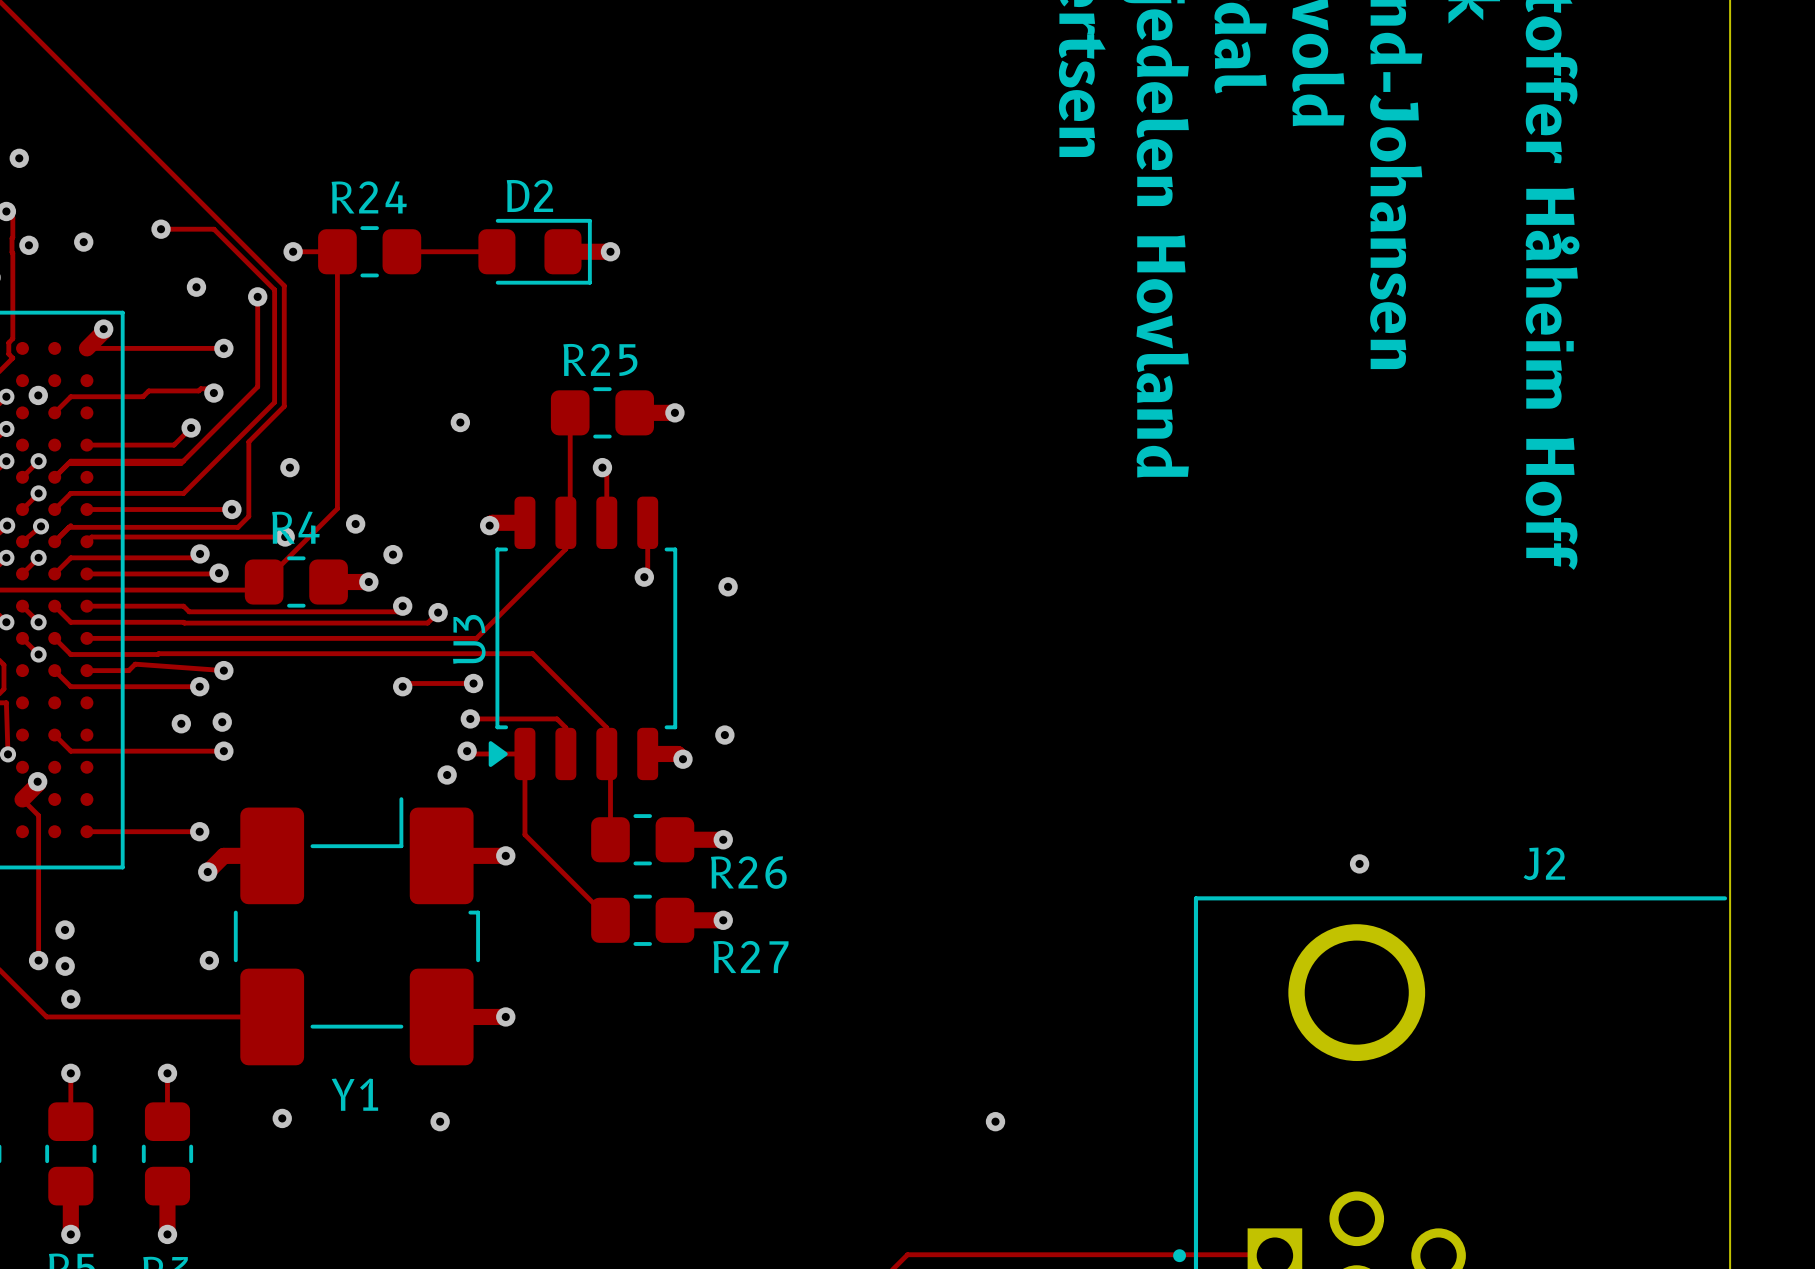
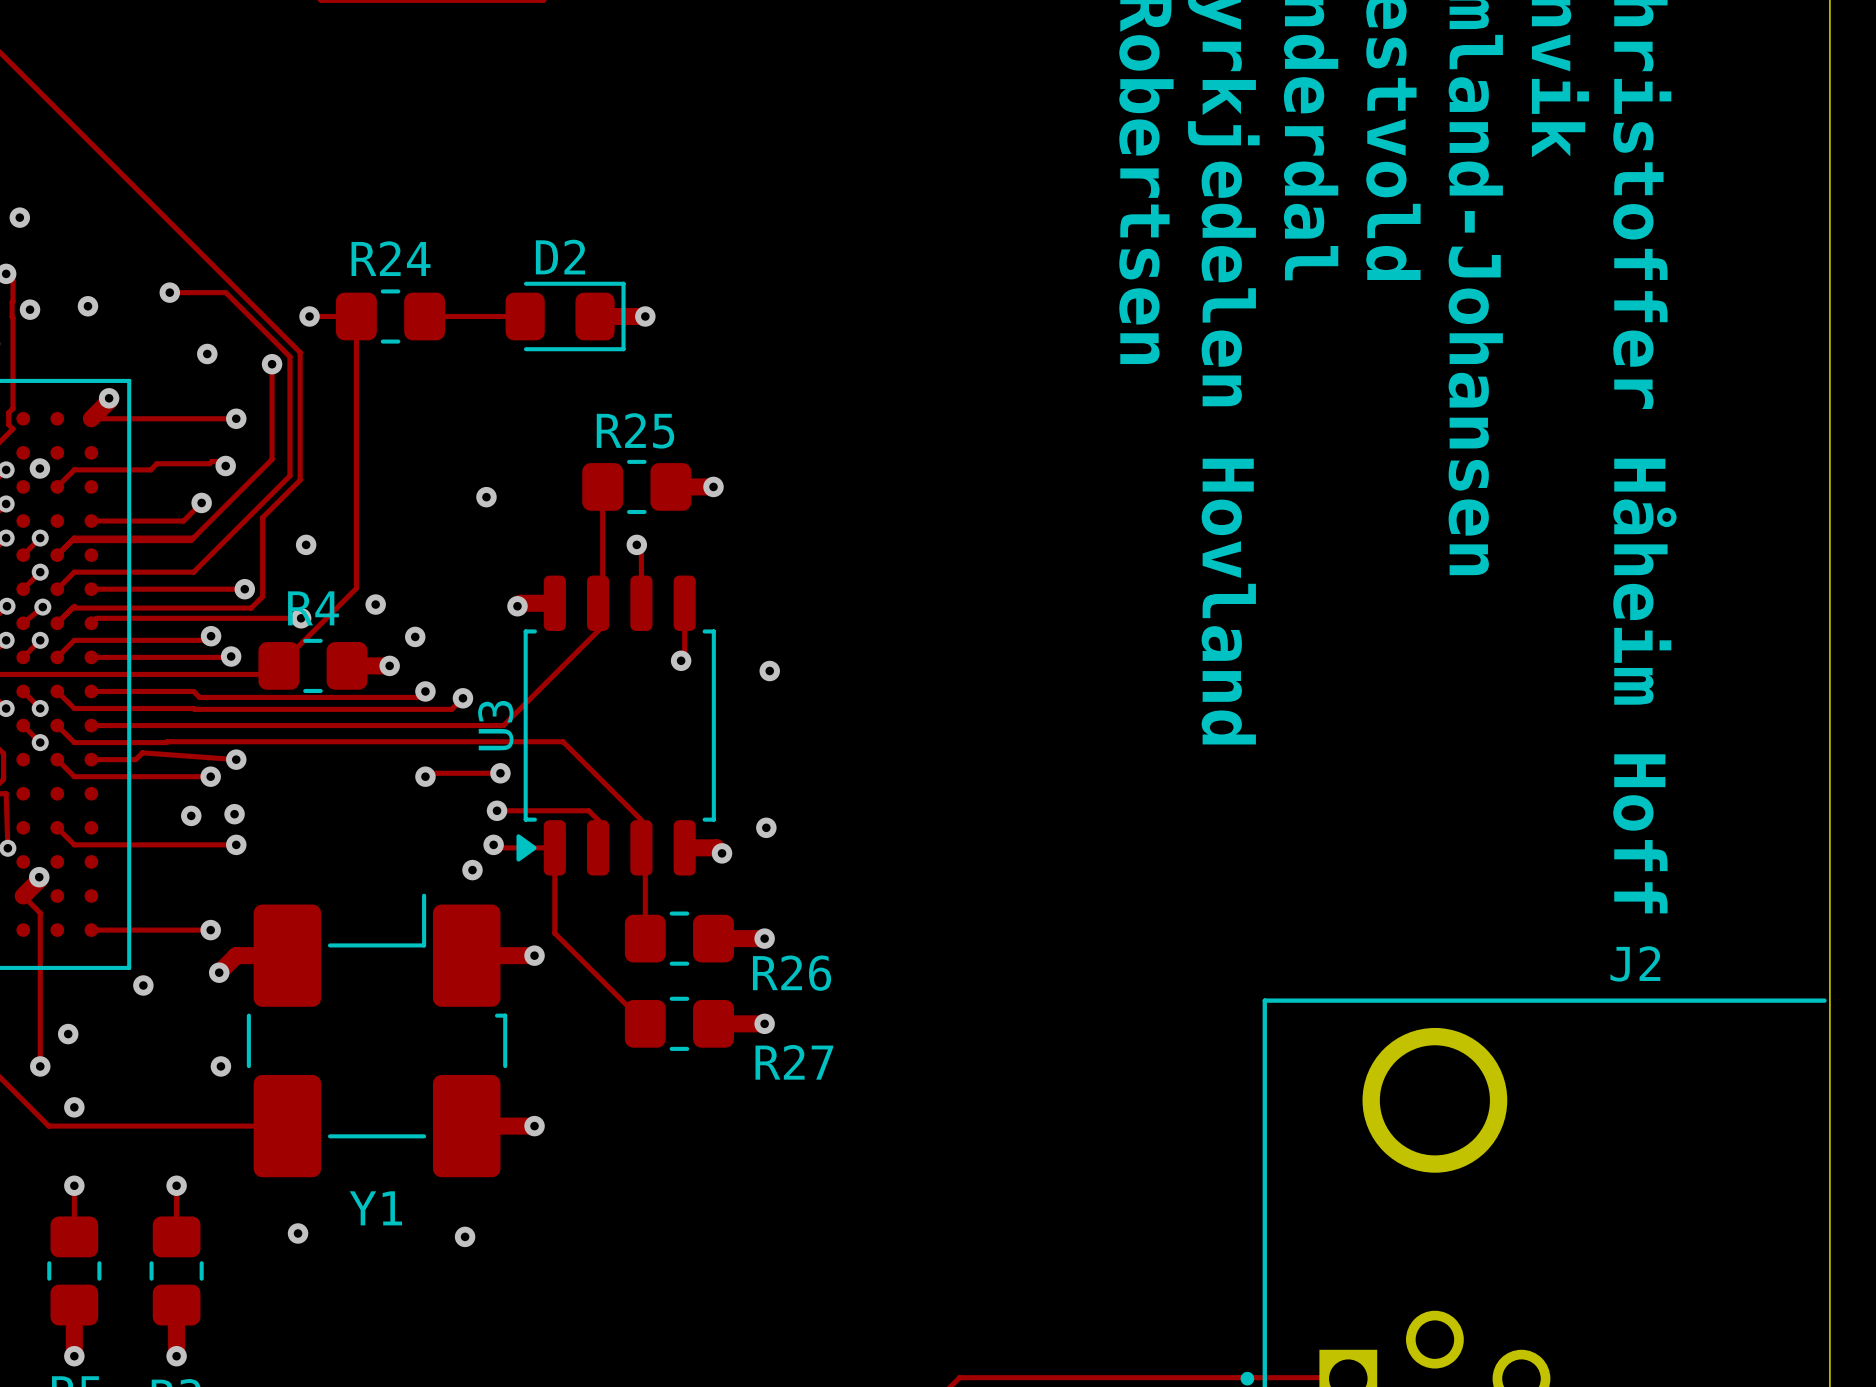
via: (1359, 863) -> none
via position: (65, 966) -> (143, 985)
via: (995, 1121) -> none

